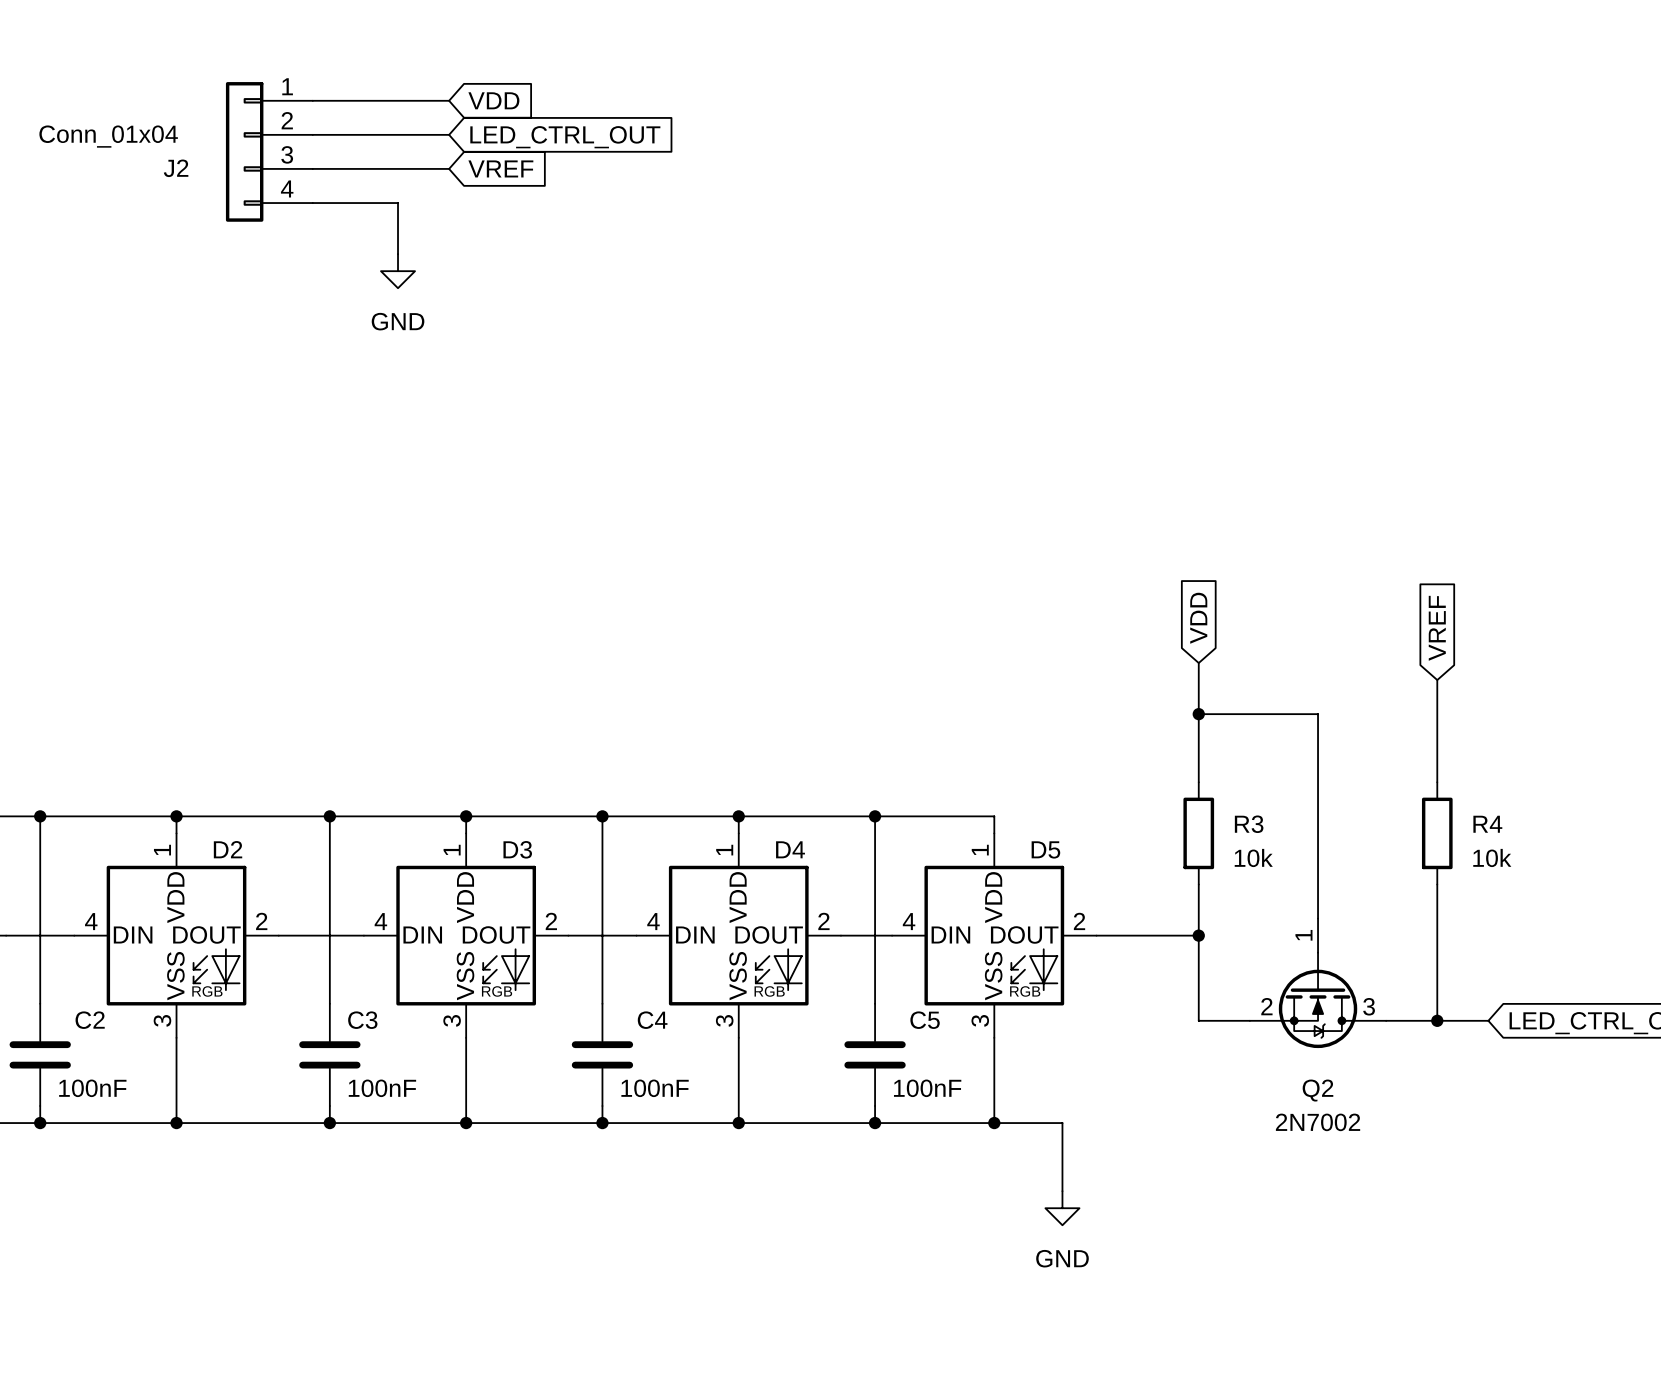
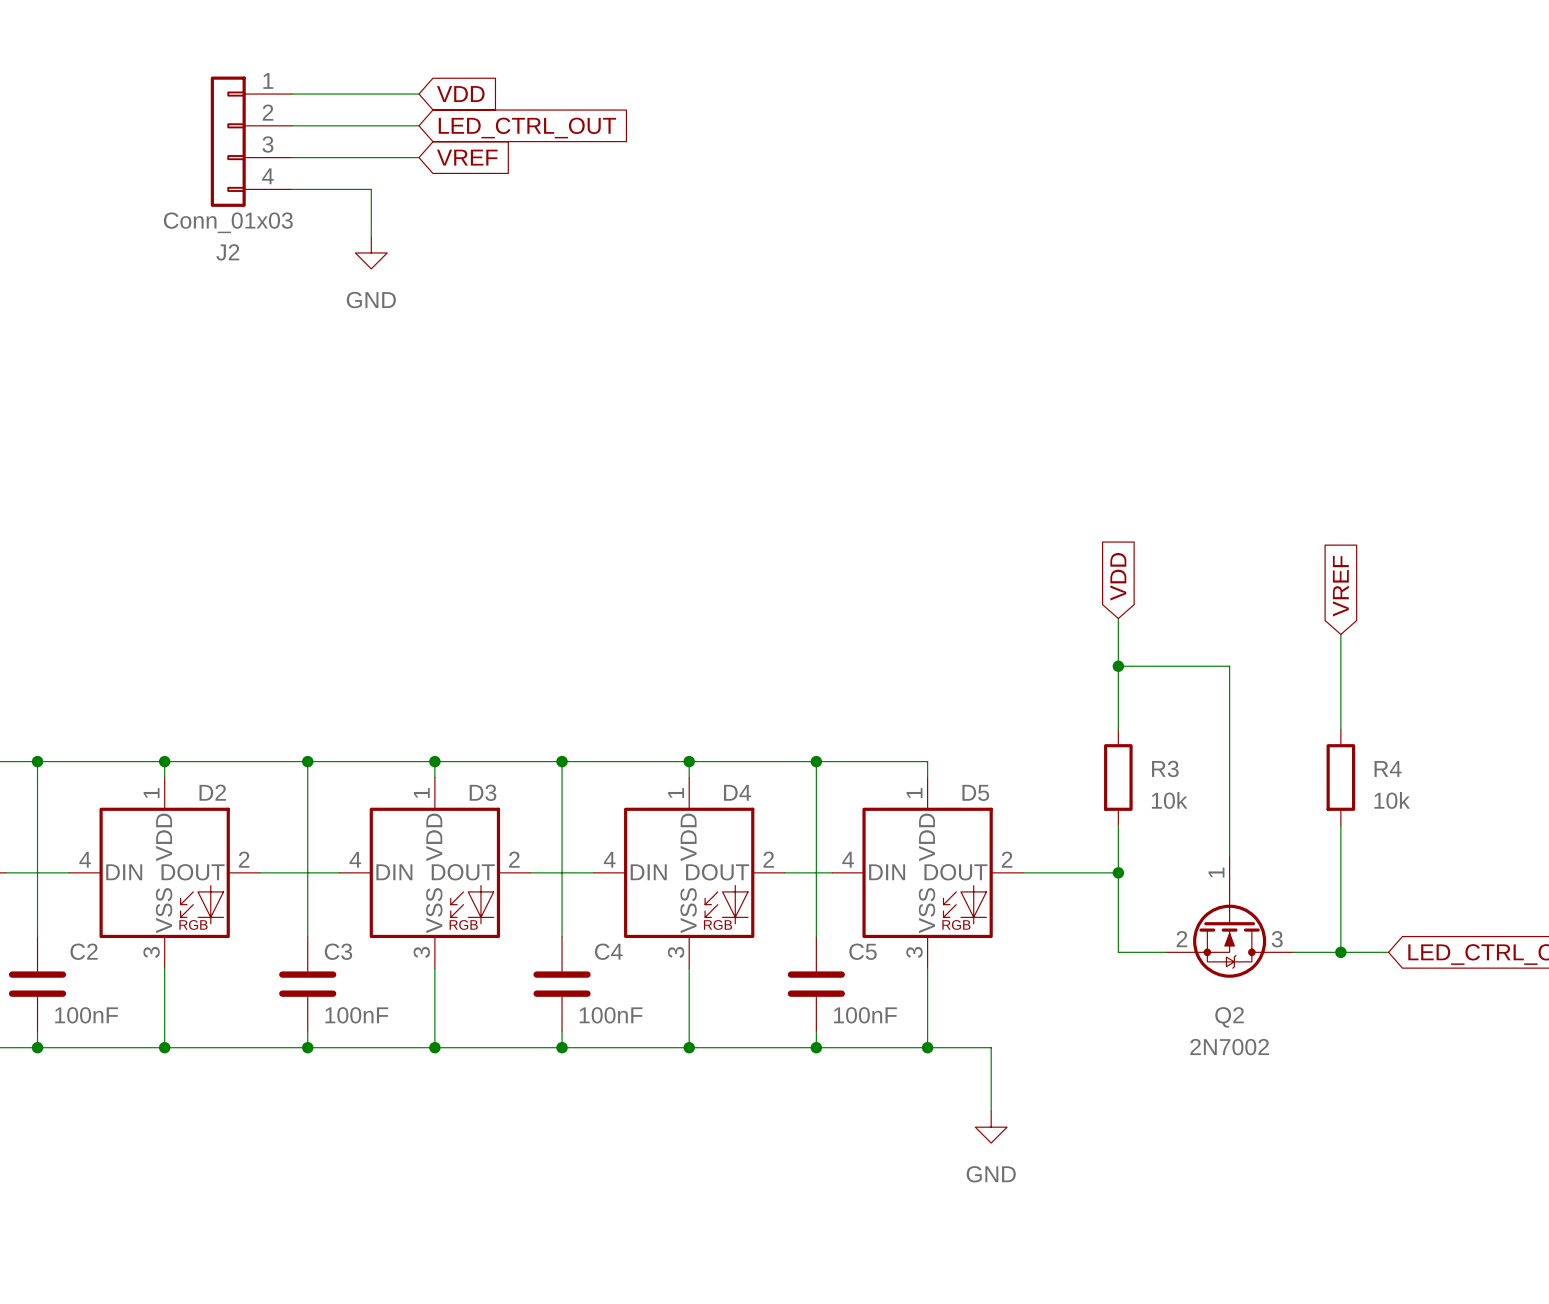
J2 value: Conn_01x04 (108, 136) -> Conn_01x03 (228, 222)
J2 name position: J2 (176, 168) -> J2 (227, 252)

